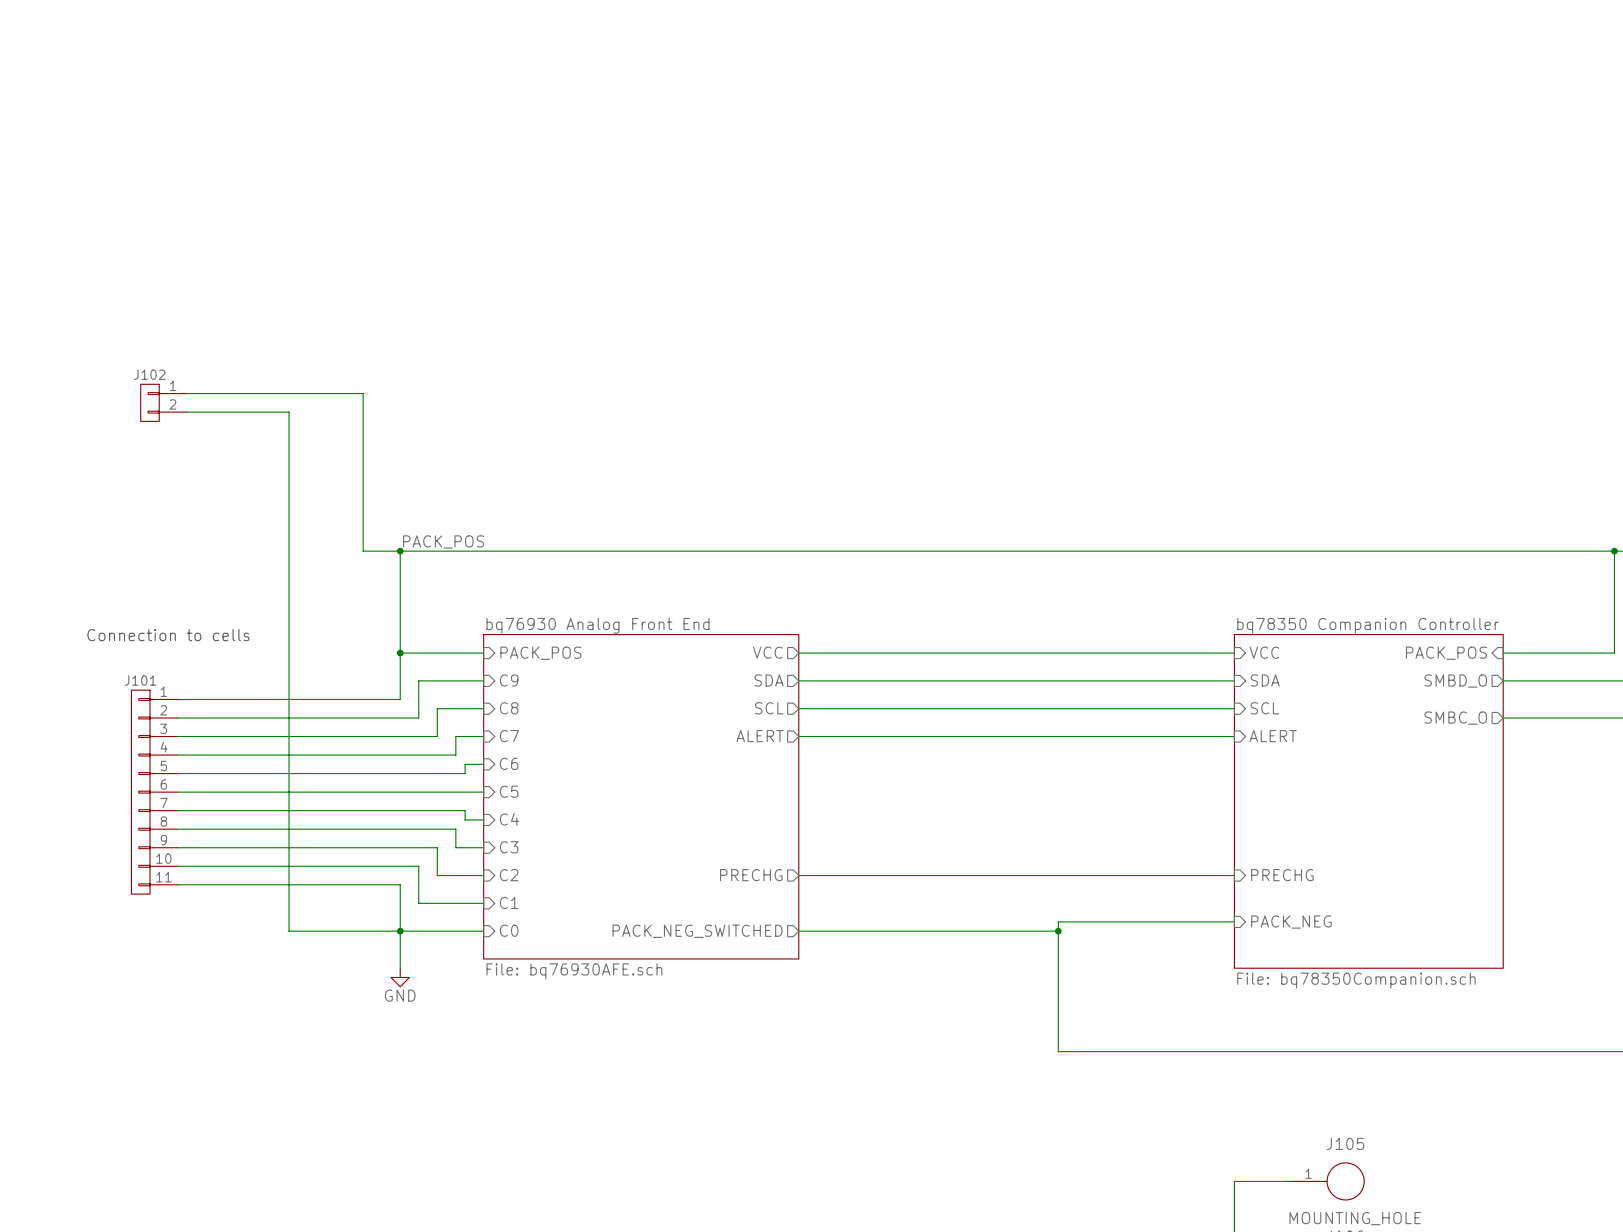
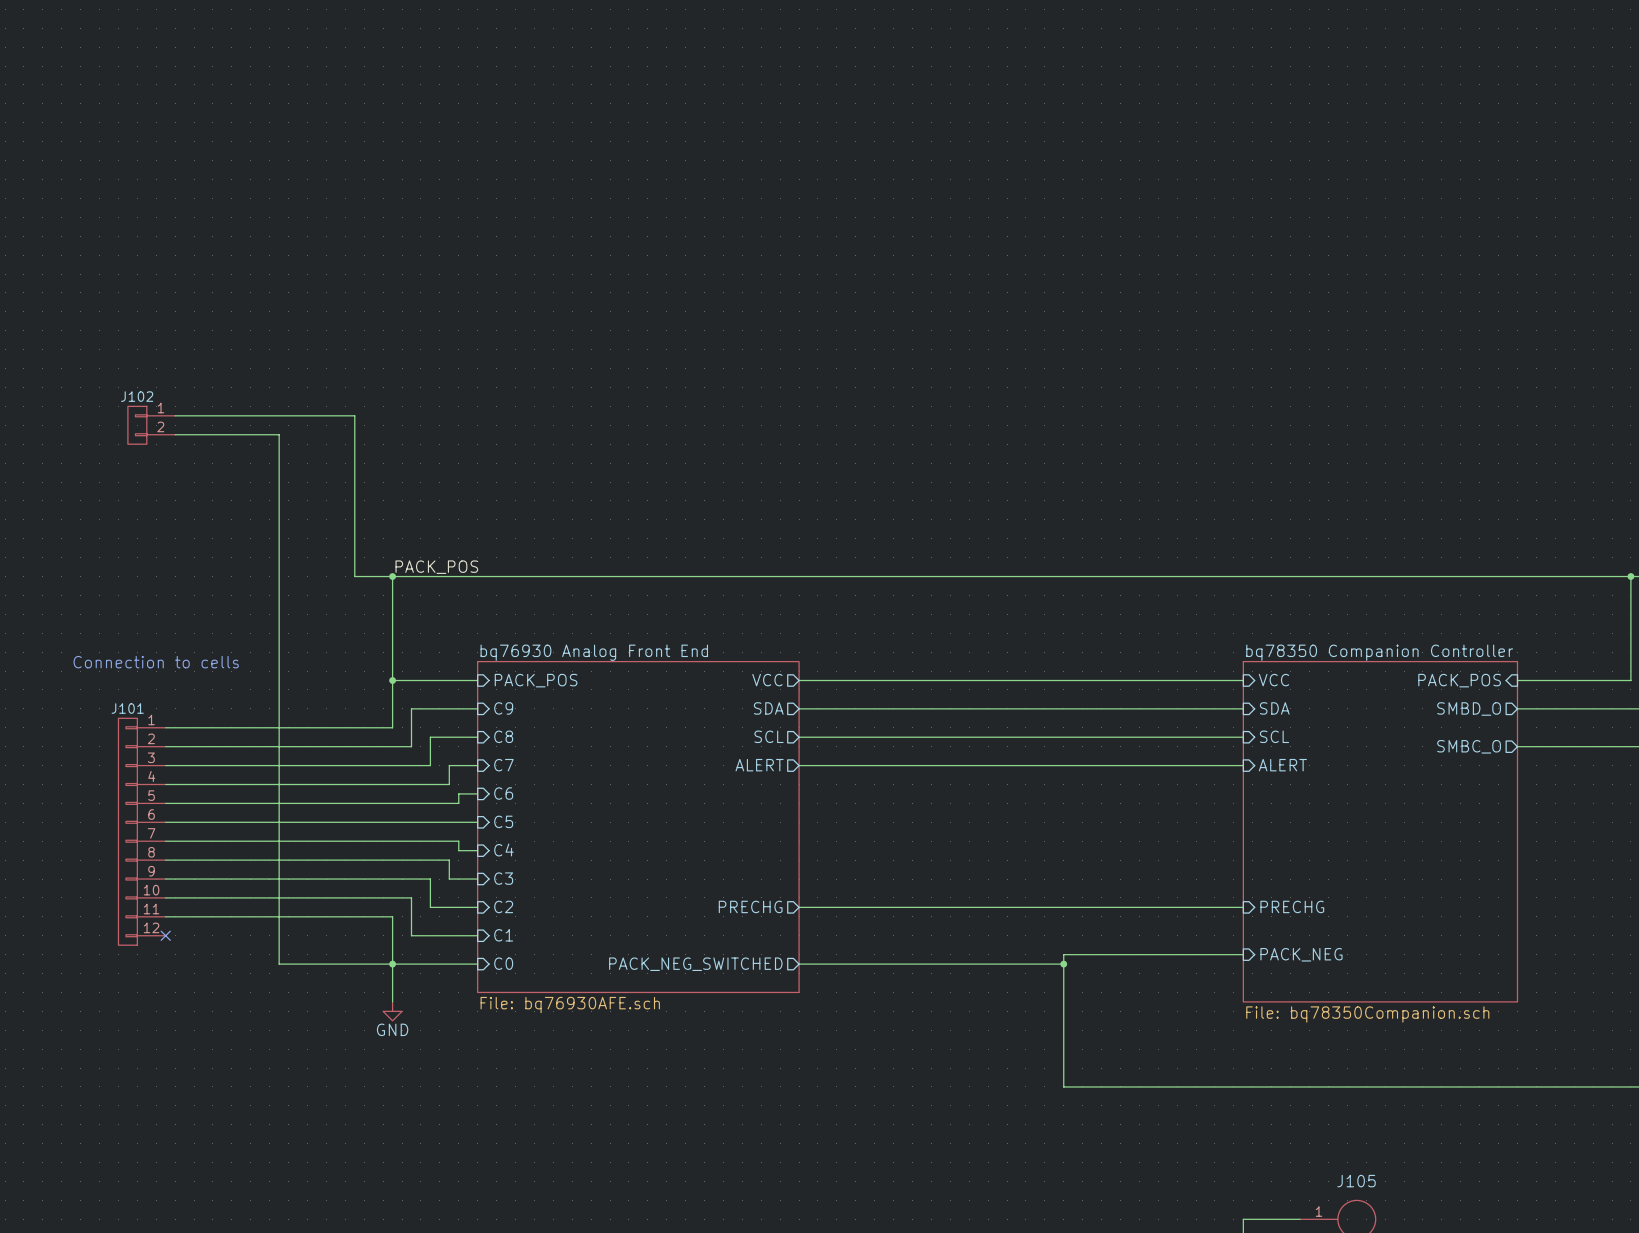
J101 symbol: [131, 690, 178, 895] -> [118, 718, 166, 946]
no-connect mark: none -> (165, 935)

